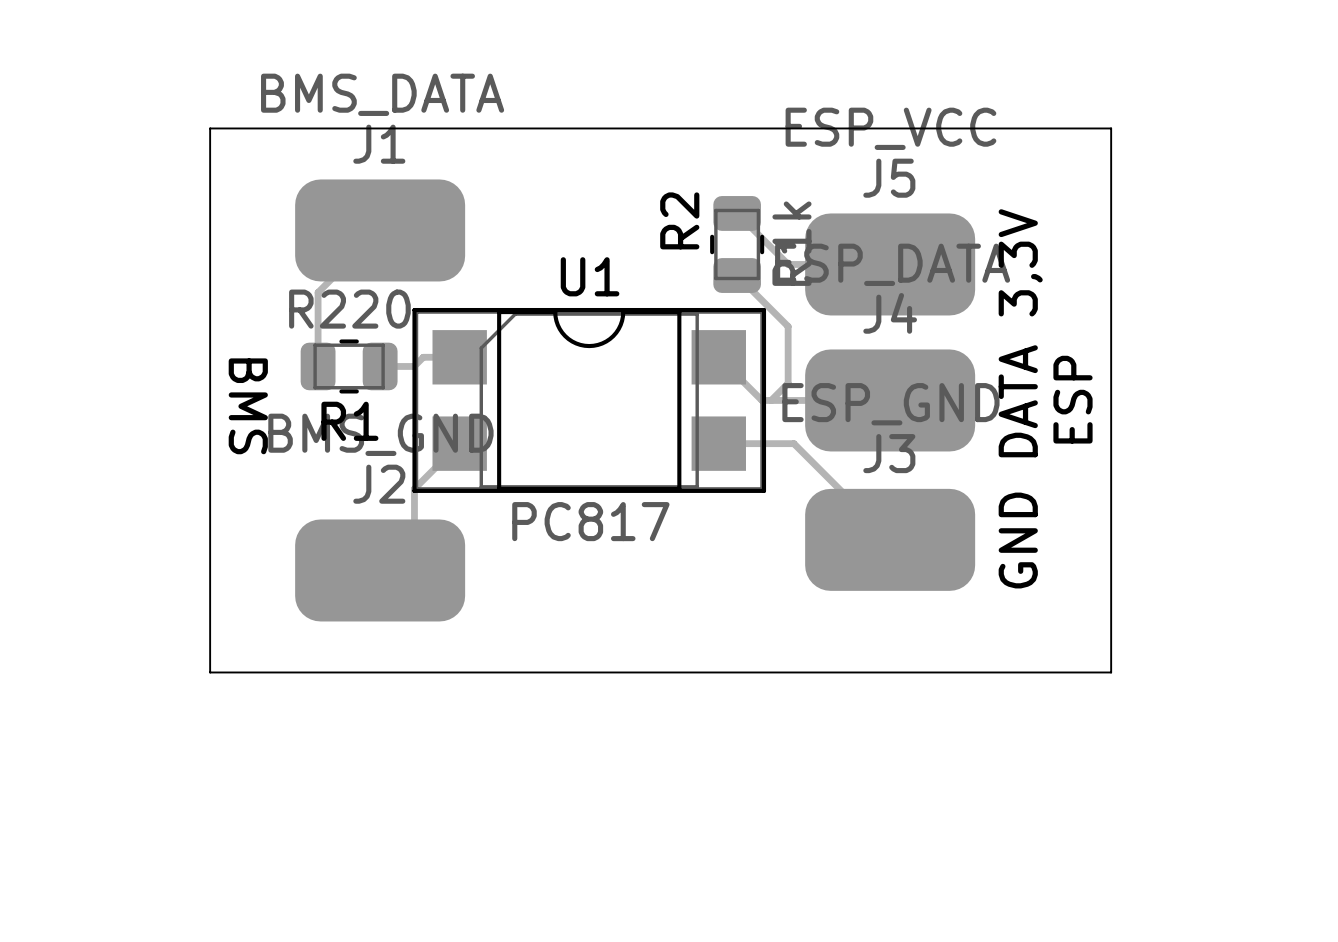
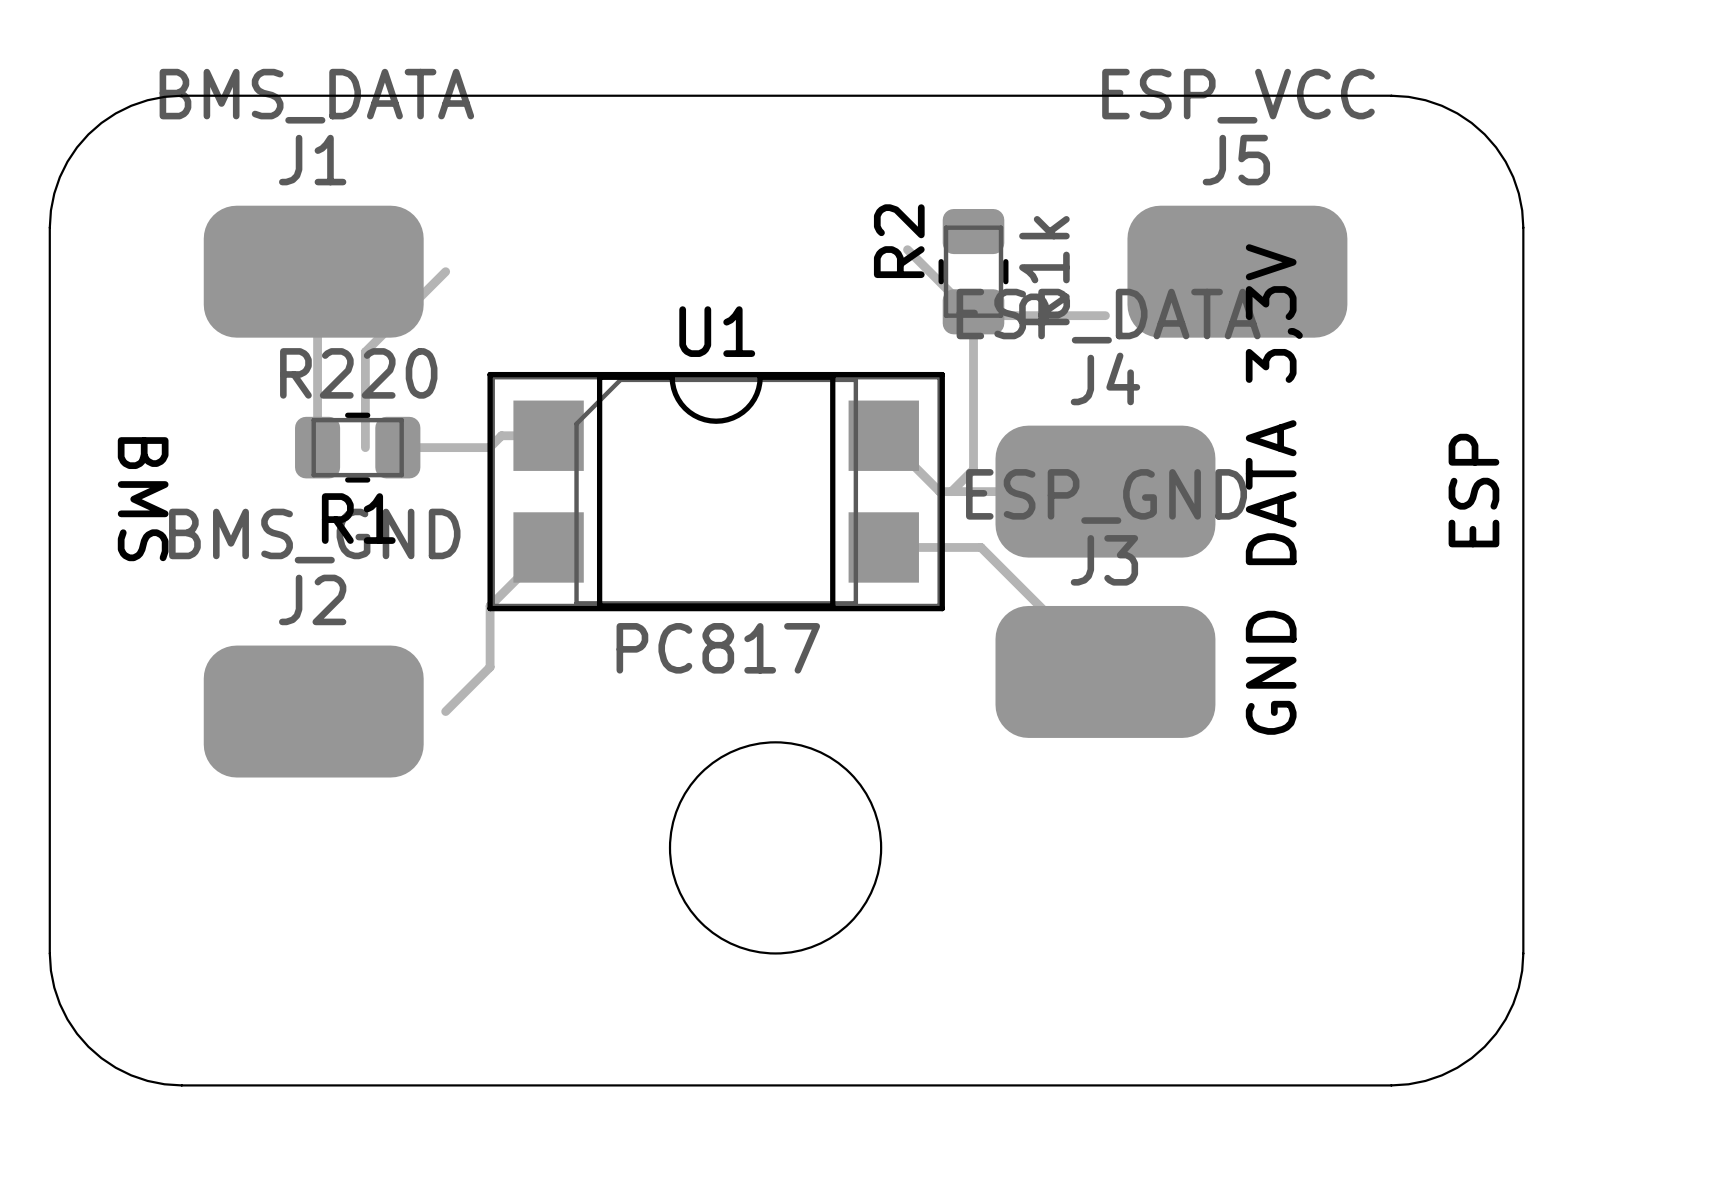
board edge: (210, 128) (1111, 128) (1111, 672) (210, 672) (210, 128) -> (181, 95) (147, 100) (131, 105) (101, 123) (88, 134) (67, 161) (54, 193) (50, 210) (49, 953) (54, 987) (67, 1019) (88, 1046) (101, 1058) (115, 1067) (147, 1080) (181, 1085) (1391, 1085) (1425, 1080) (1457, 1067) (1471, 1058) (1496, 1033) (1513, 1003) (1518, 987) (1523, 953) (1523, 227) (1522, 210) (1513, 177) (1496, 147) (1471, 123) (1457, 113) (1425, 100) (1391, 95) (181, 95)
track: none -> (313, 271) (317, 275) (317, 447)
J1 position: (380, 230) -> (313, 271)
R2 position: (737, 244) -> (973, 271)
J5 position: (890, 264) -> (1237, 271)
track: (737, 275) (788, 326) -> (973, 311) (973, 395)
track: none -> (397, 447) (445, 447)
R1 position: (349, 366) -> (357, 447)
text position: ESP (1072, 399) -> ESP (1473, 490)
text position: BMS (248, 406) -> BMS (143, 499)
J2 position: (380, 570) -> (313, 711)
round board edge: none -> [668, 741, 883, 955]

